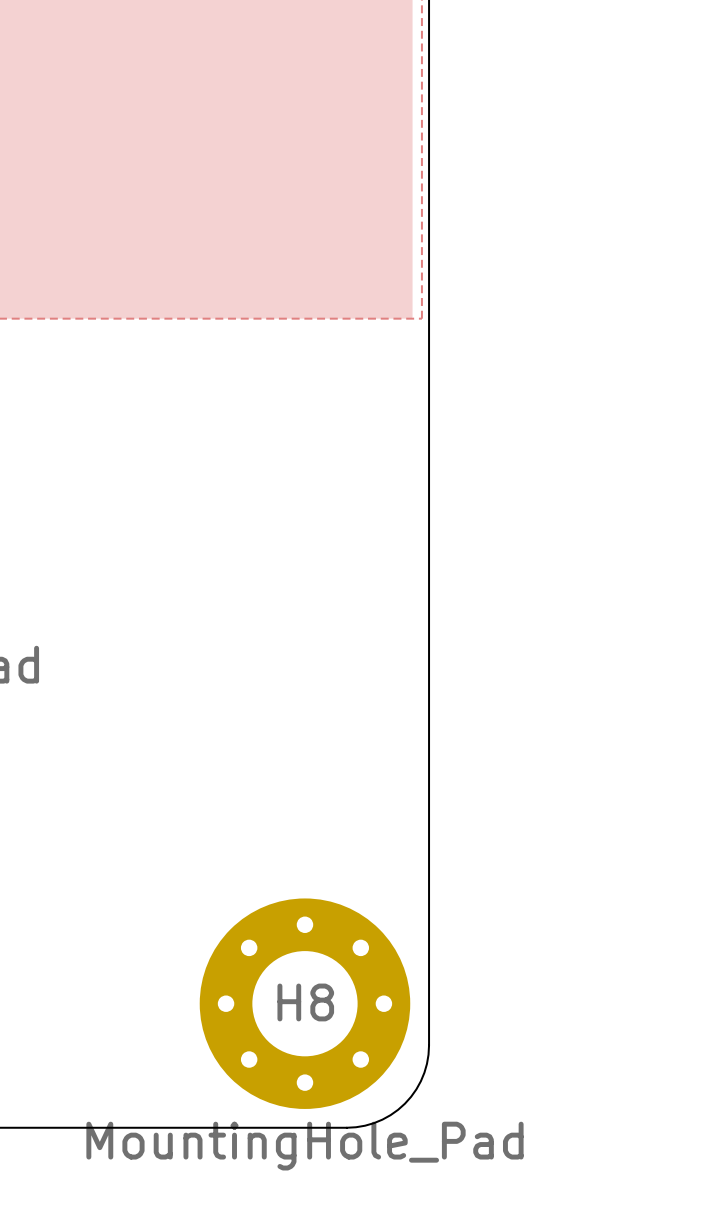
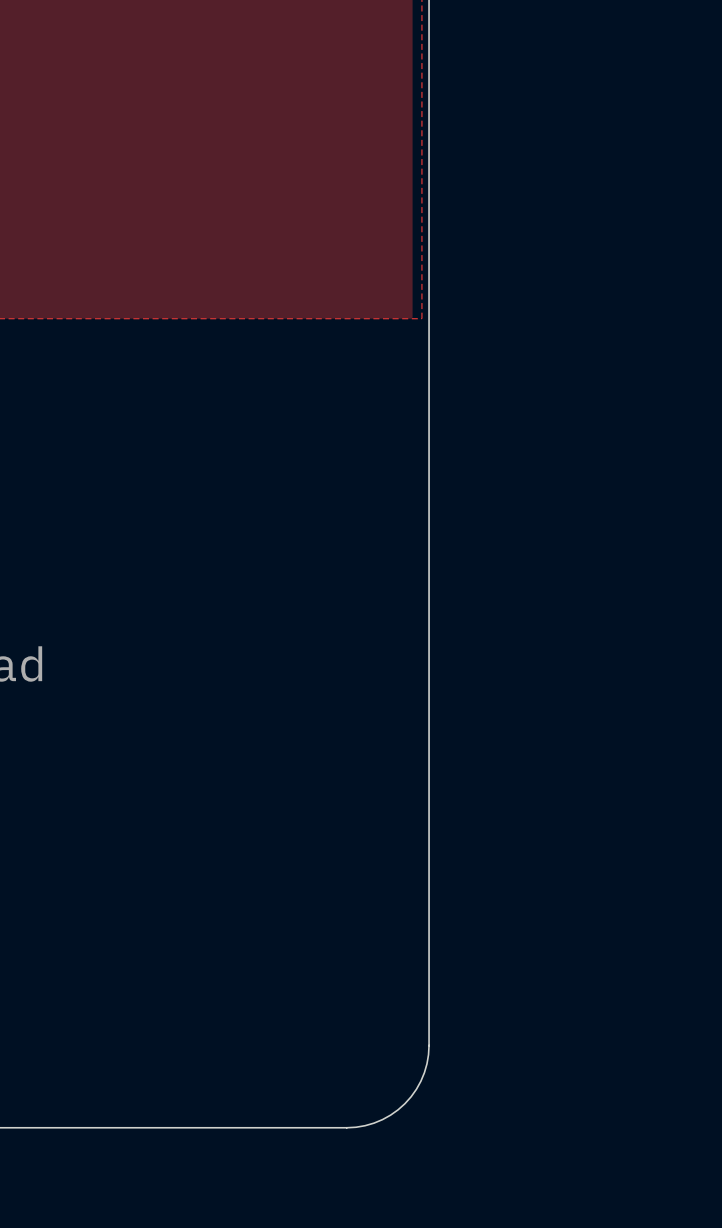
H8: MountingHole_Pad (304, 1003) -> none

